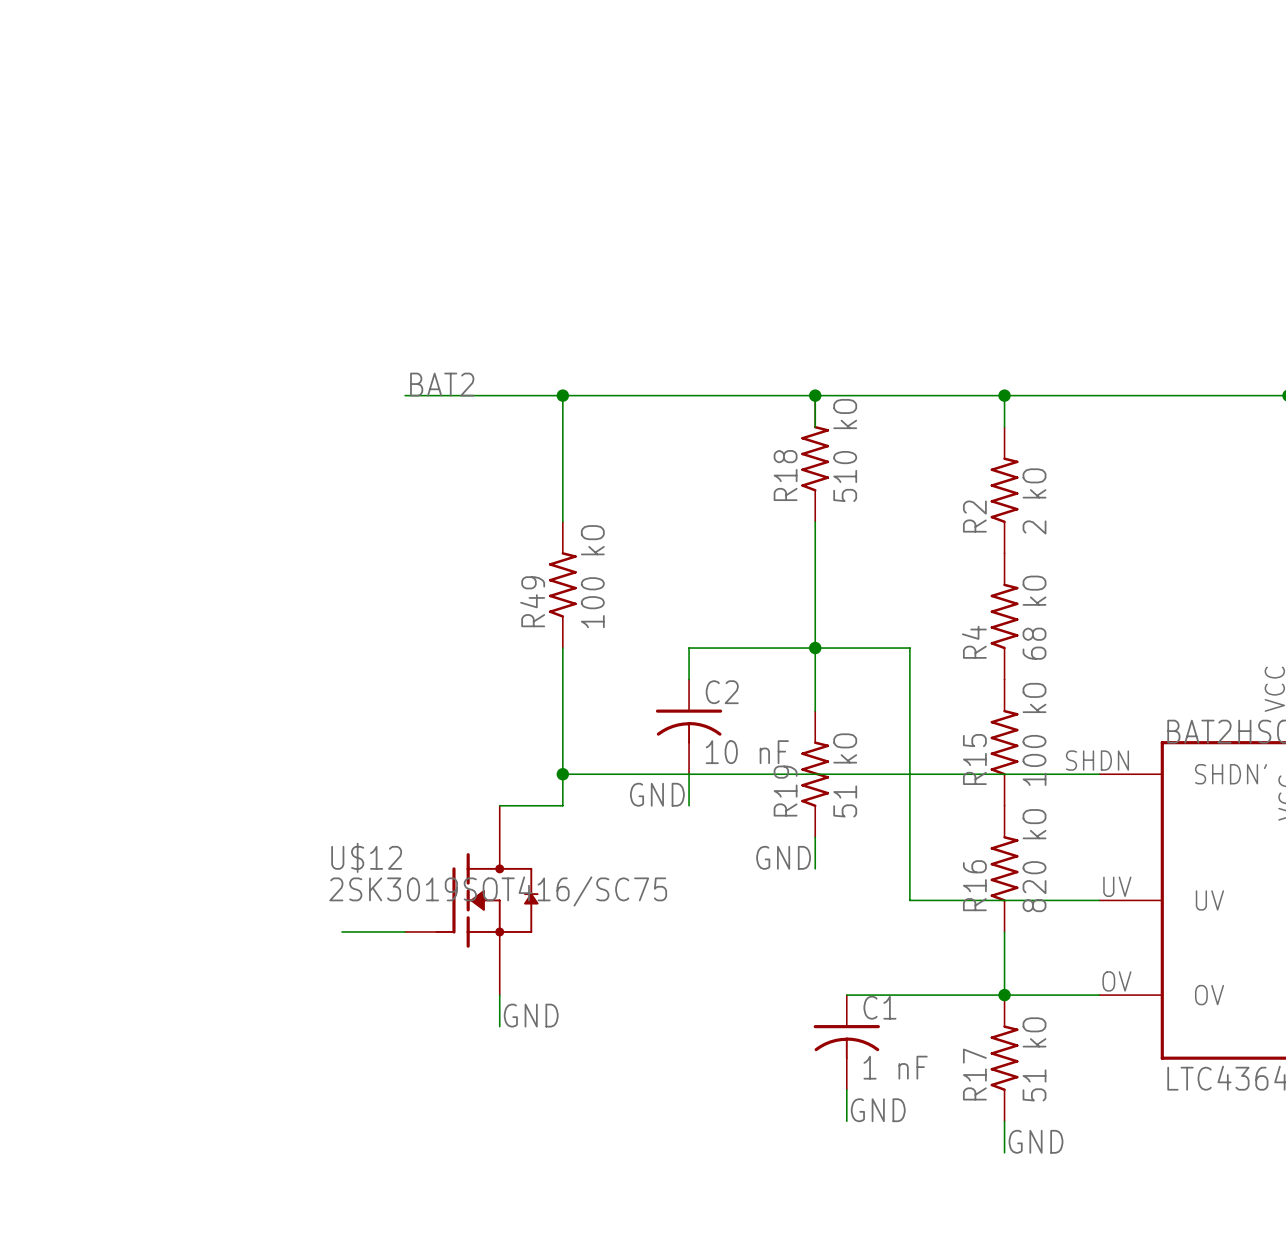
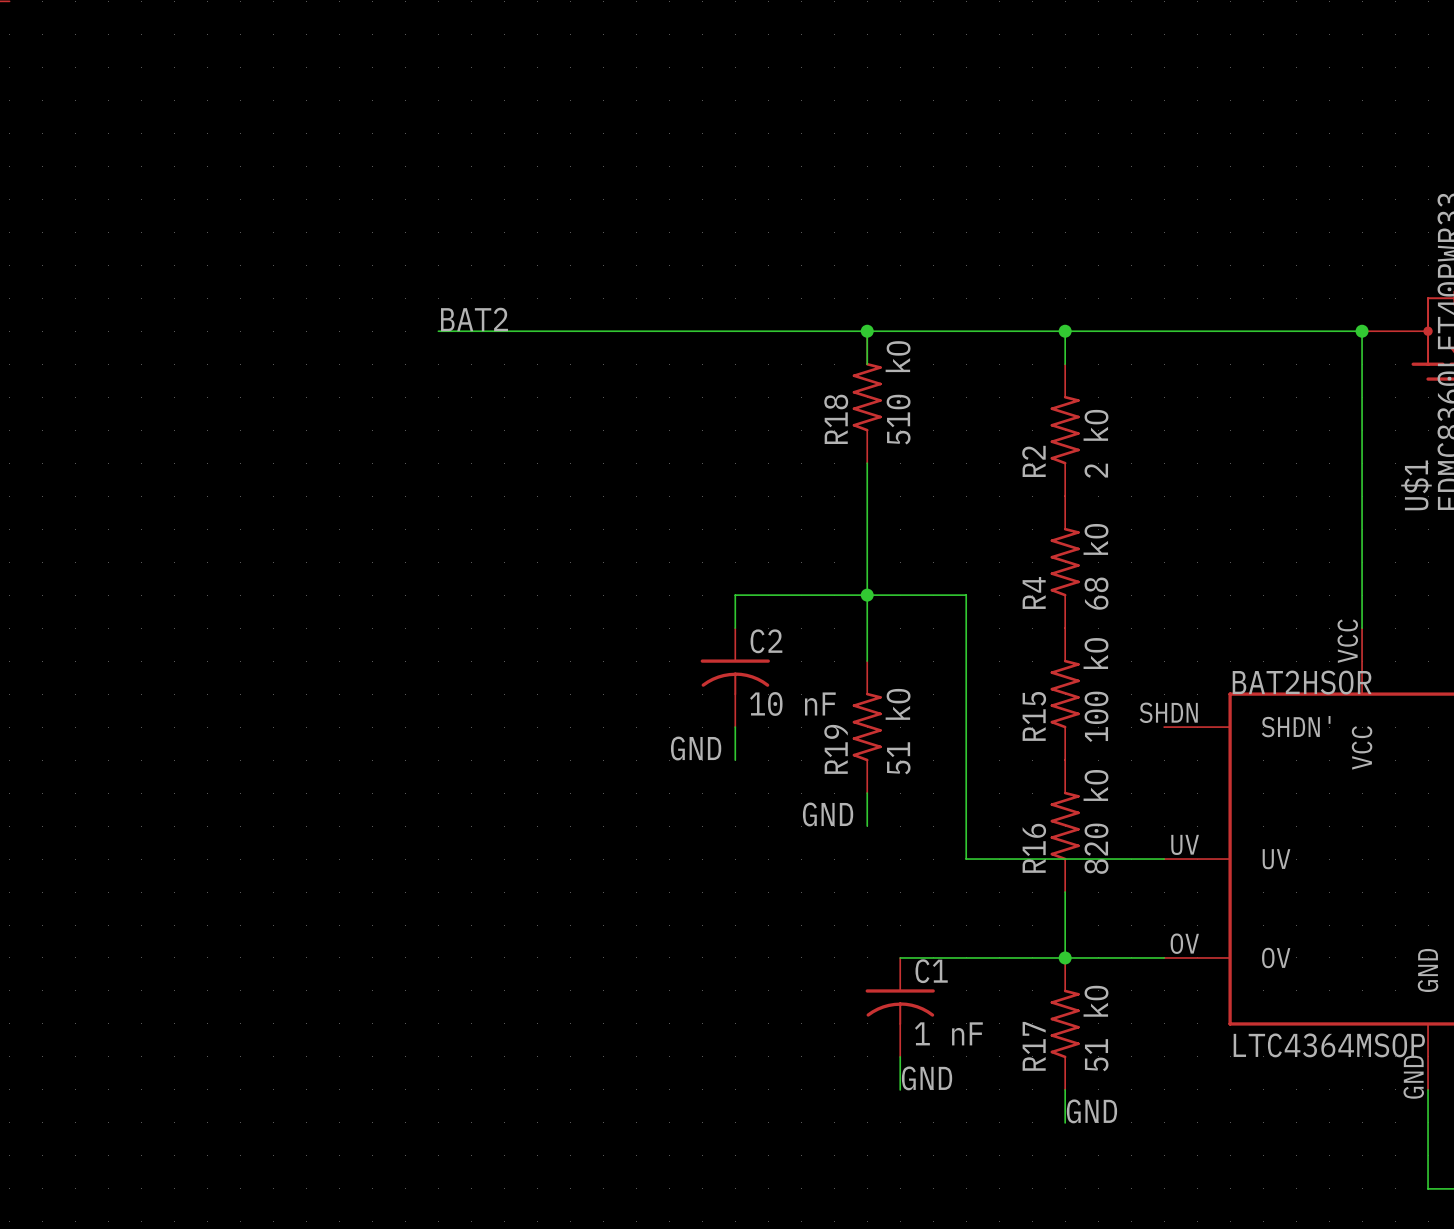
wire: (562, 395) (562, 521) -> none
junction: (562, 395) -> none
R49: 100 kO (562, 584) -> none
wire: (562, 648) (562, 805) (499, 805) -> none
wire: (562, 774) (1099, 774) -> none
junction: (562, 774) -> none
U$12: 2SK3019SOT416/SC75 (471, 900) -> none
wire: (341, 931) (405, 931) -> none
wire: (499, 995) (499, 1026) -> none
label: GND (531, 1015) -> none

